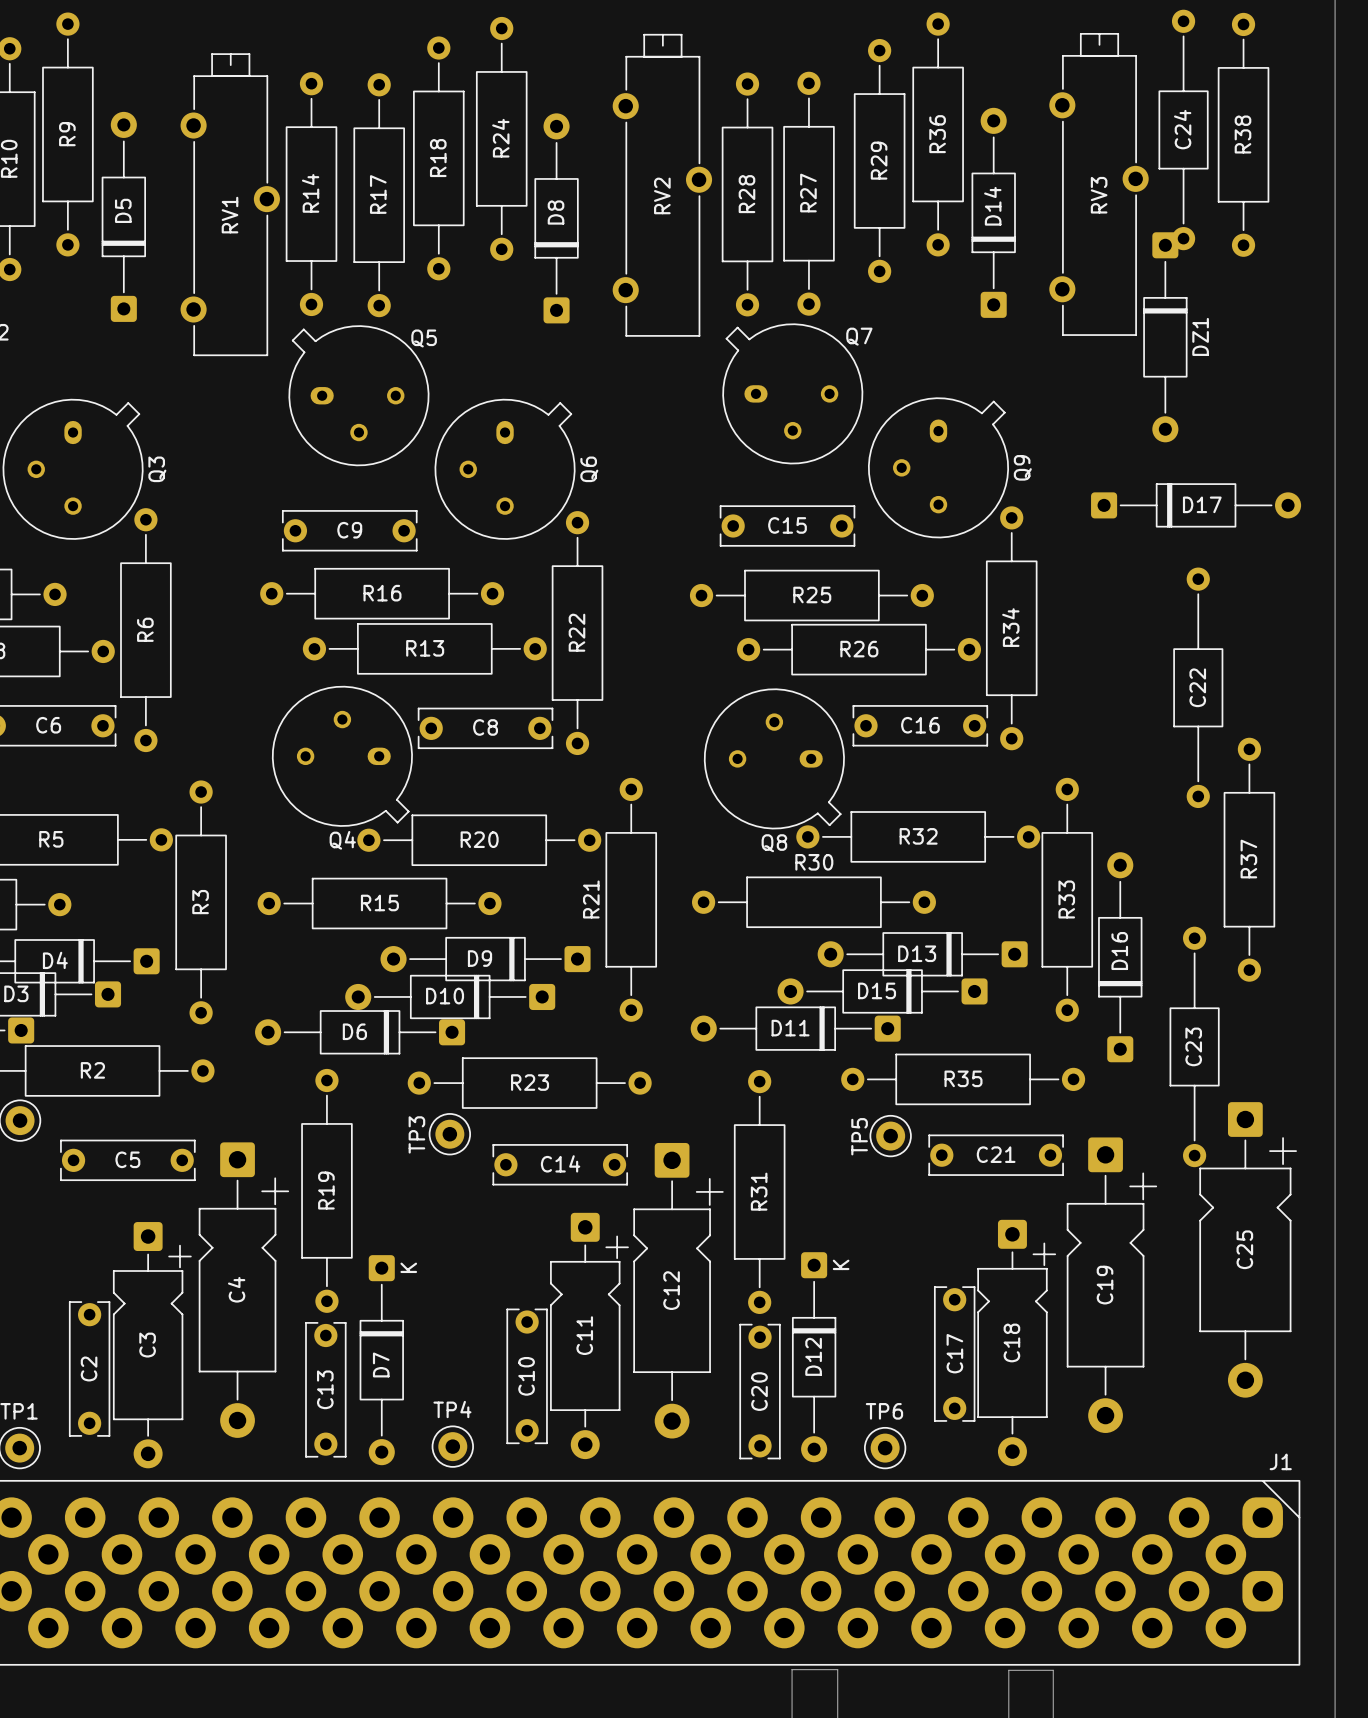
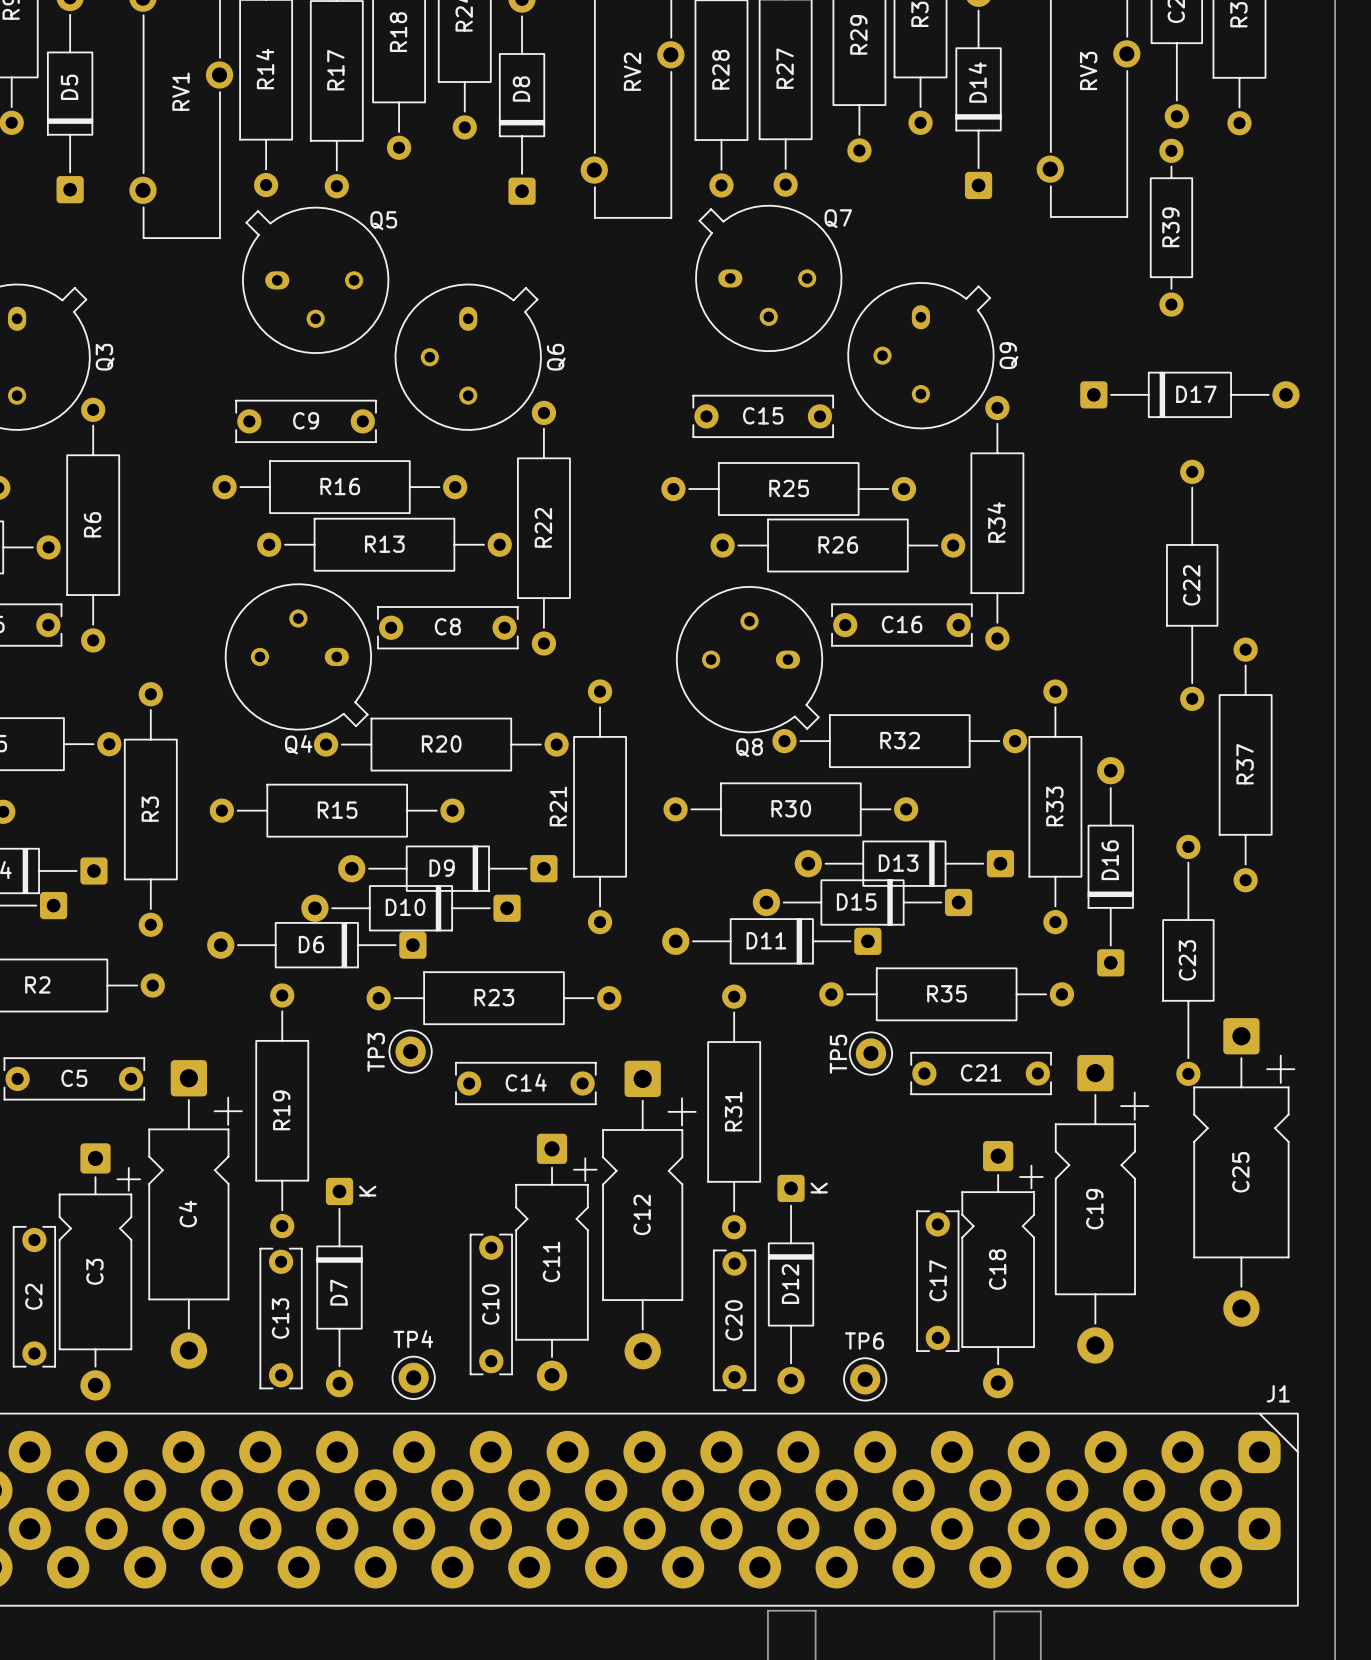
DZ1: (1165, 337) -> none
R39: none -> (1171, 227)
R30 name position: R30 (814, 862) -> R30 (791, 808)

